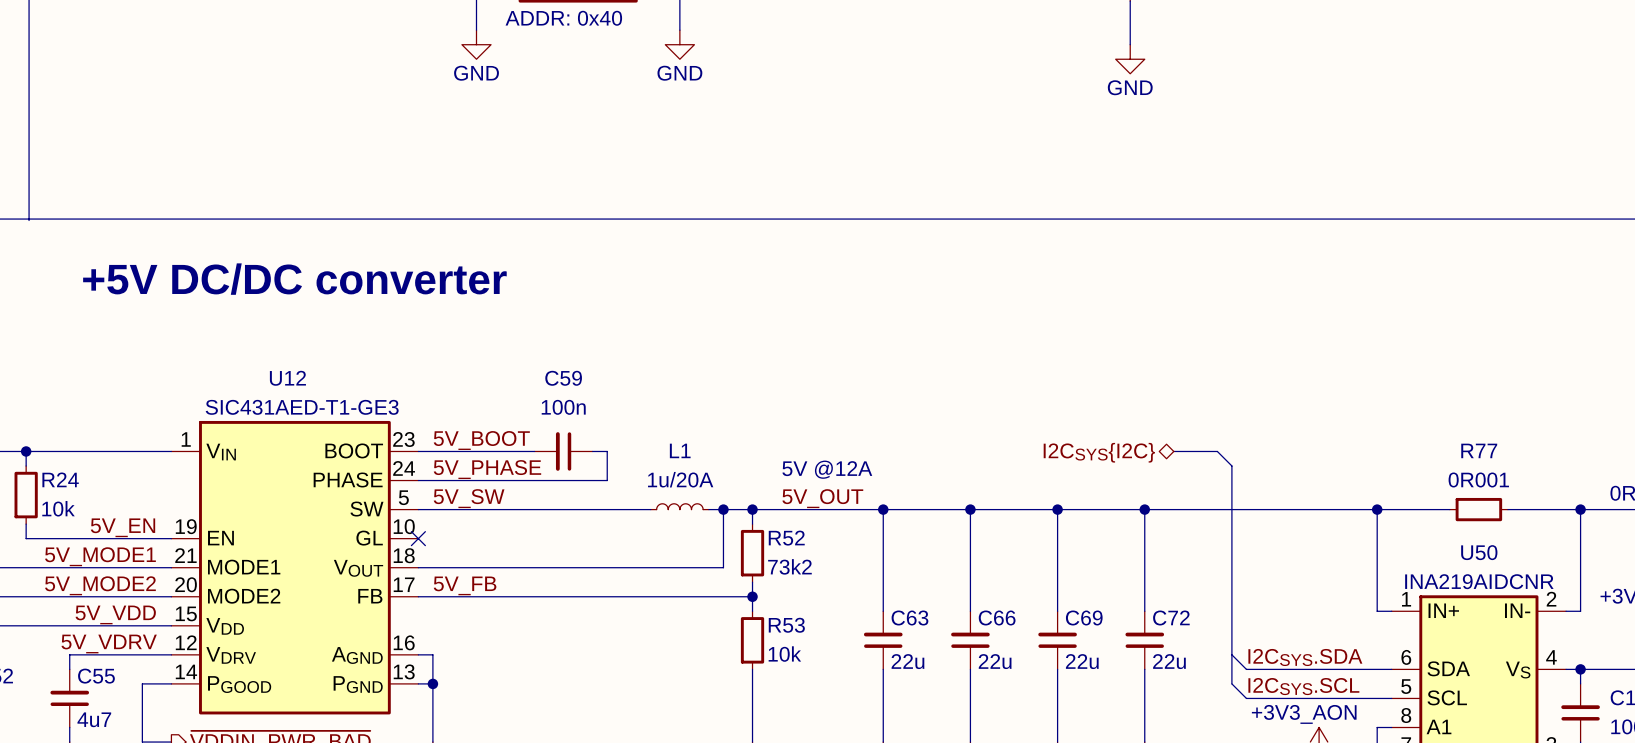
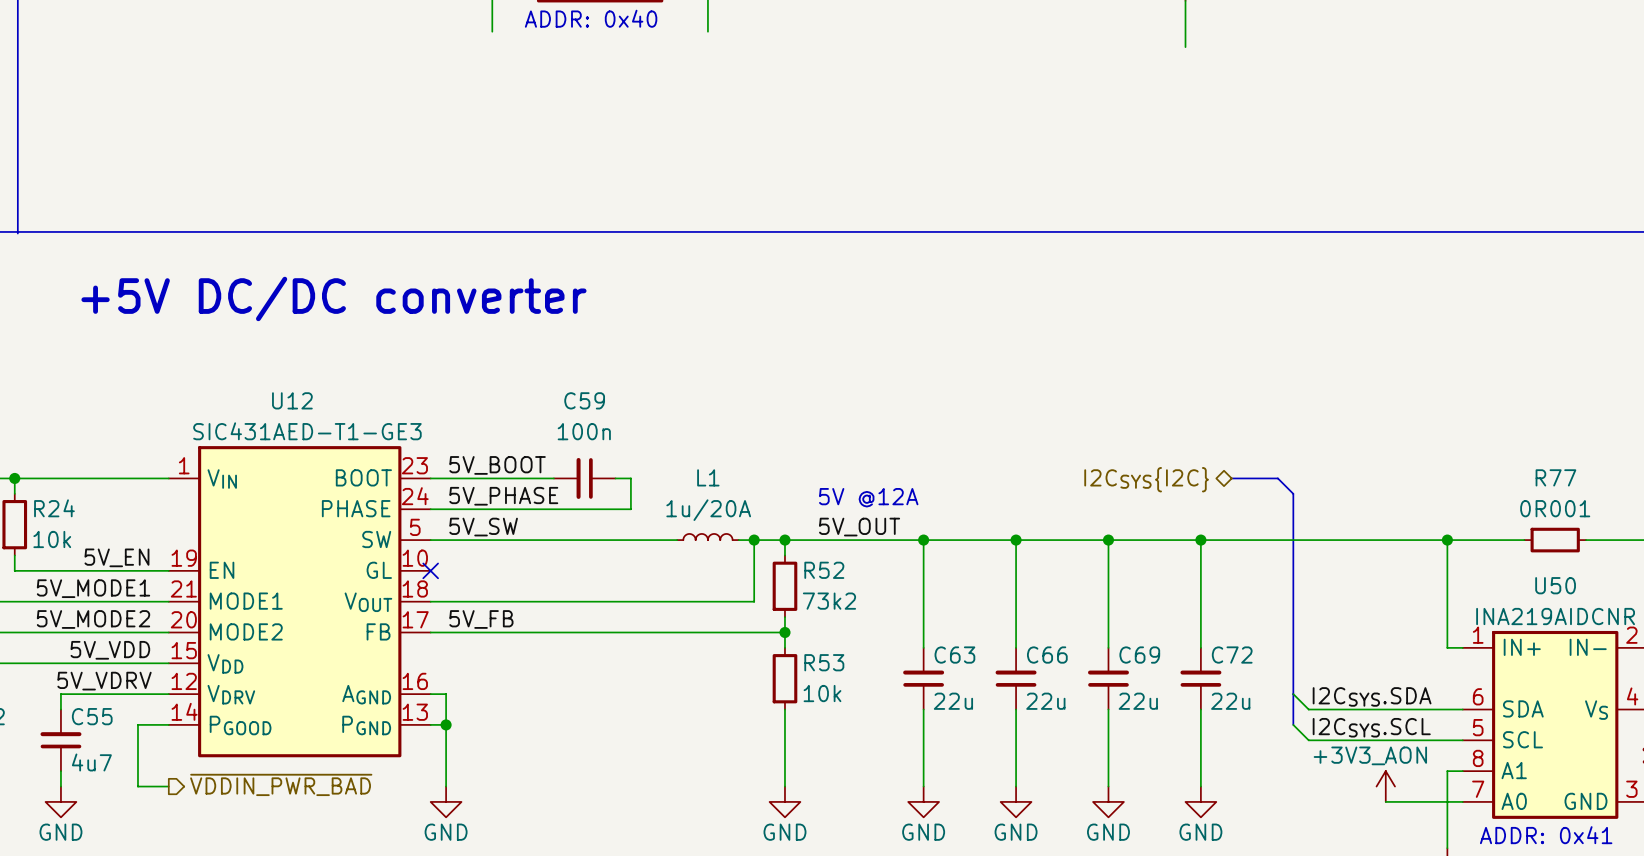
power symbol: GND (476, 44) -> none
power symbol: GND (679, 44) -> none
power symbol: GND (1130, 59) -> none

